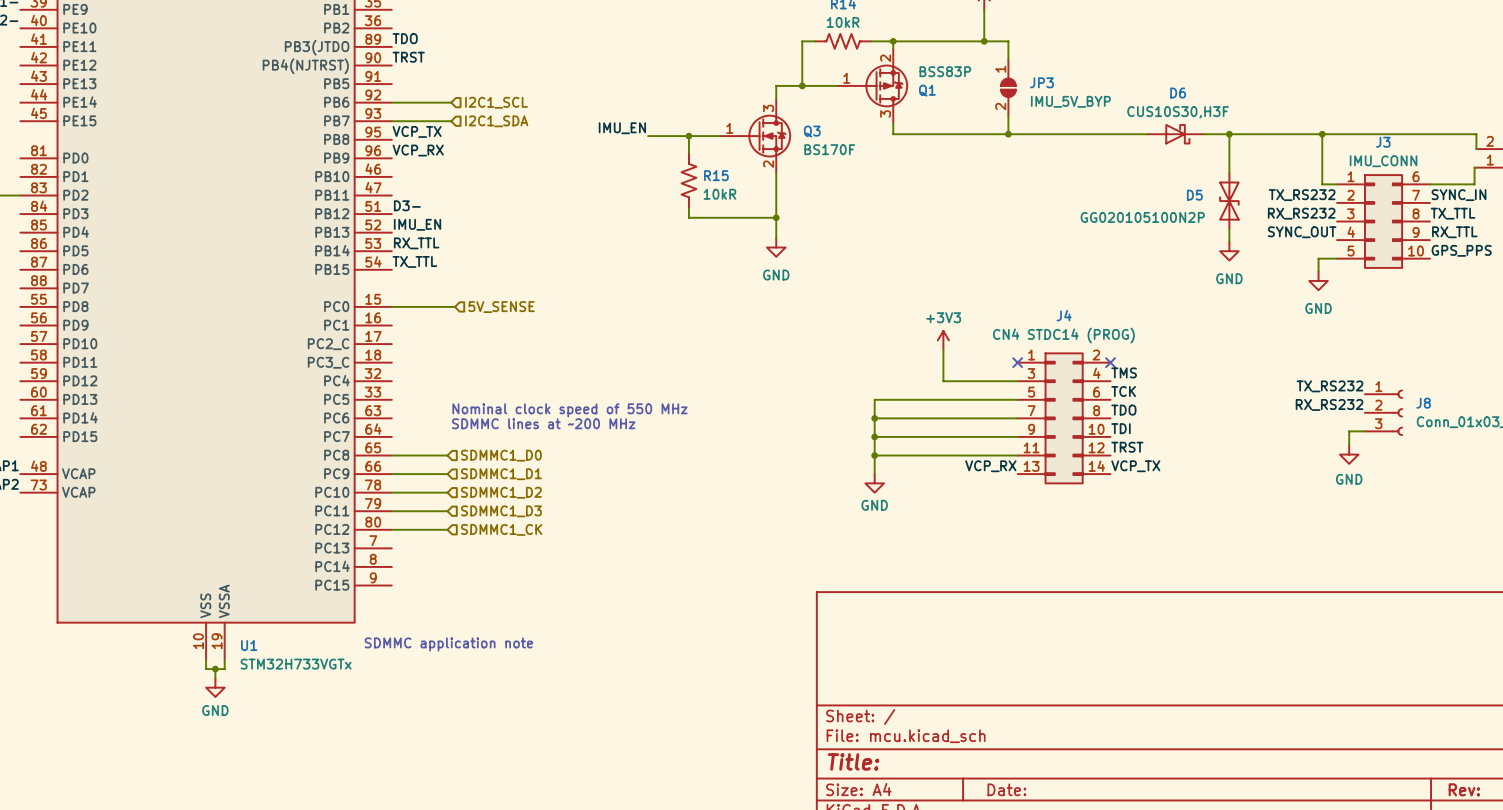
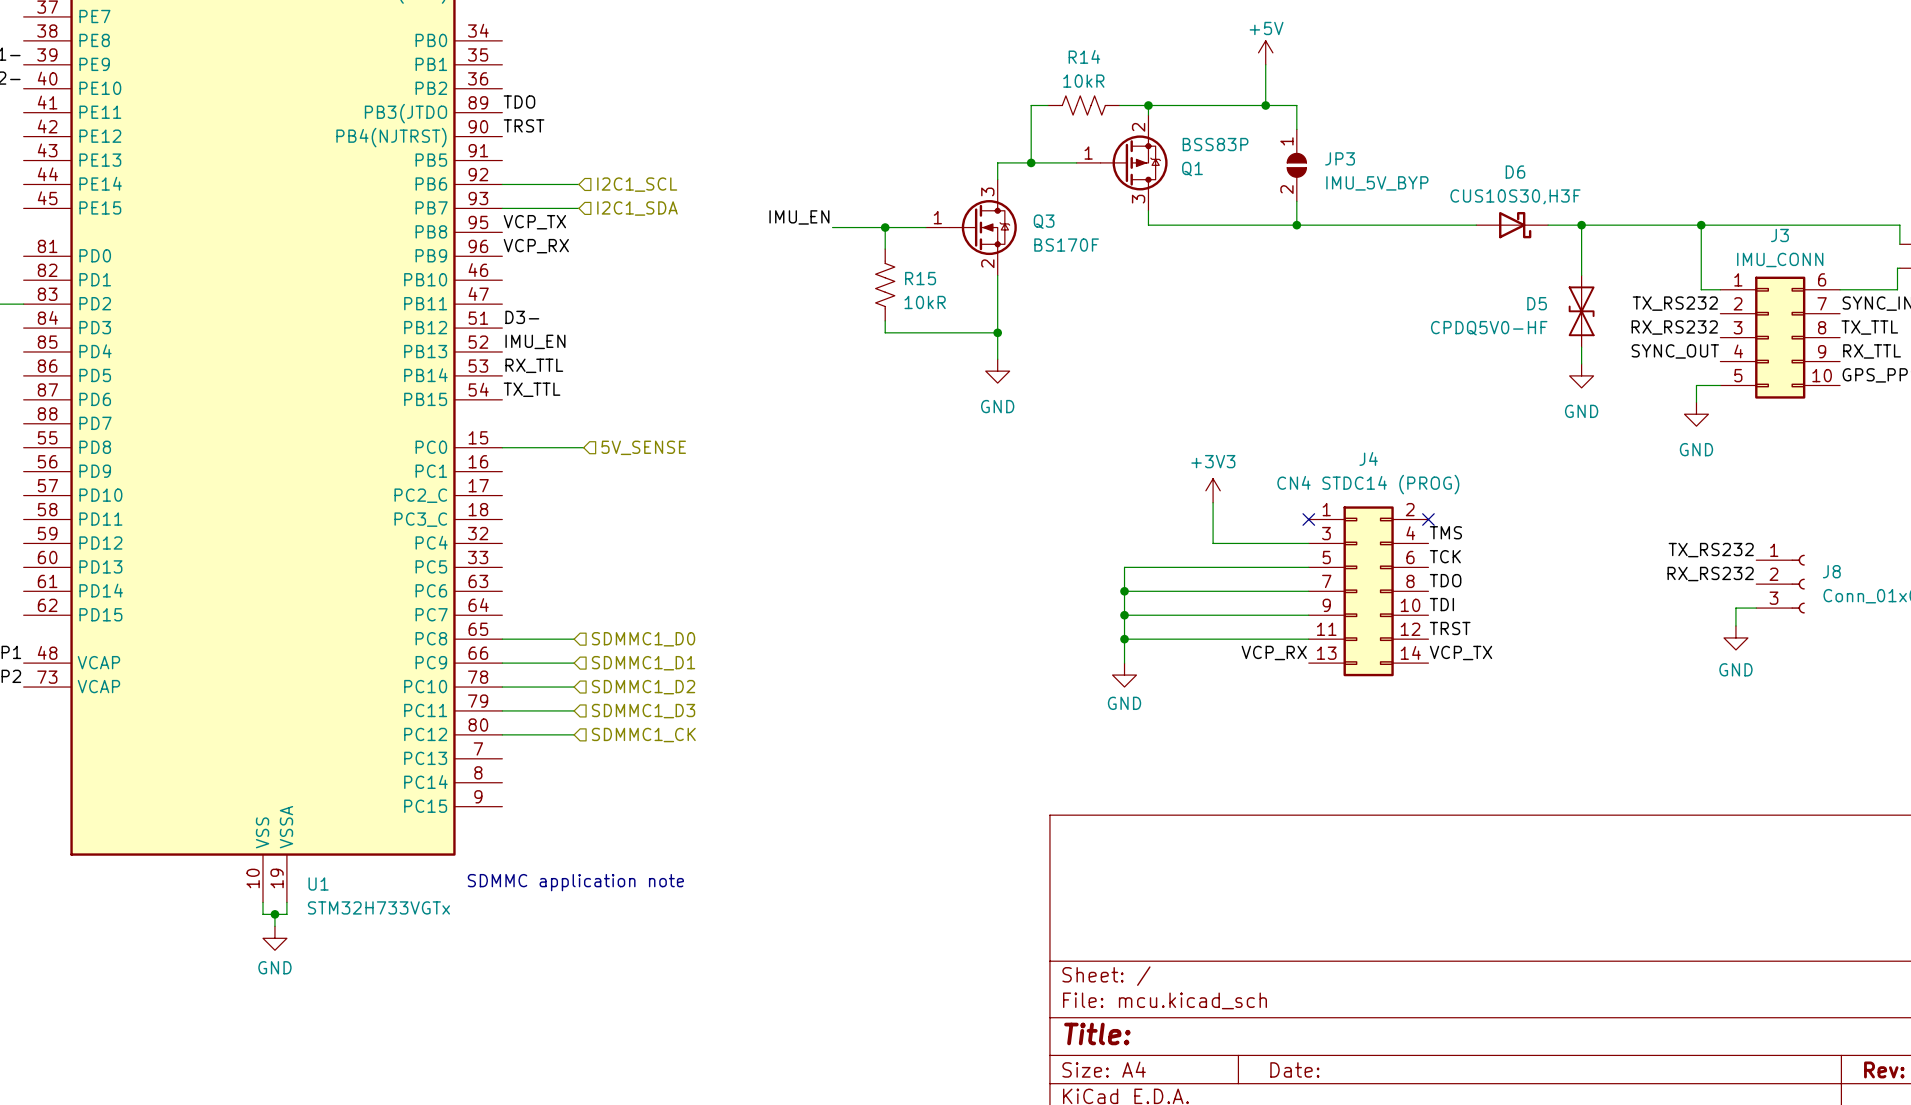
D5 value: GG020105100N2P (1142, 217) -> CPDQ5V0-HF (1489, 328)
text: Nominal clock speed of 550 MHz (570, 410) -> none
text: SDMMC lines at ~200 MHz (543, 423) -> none

